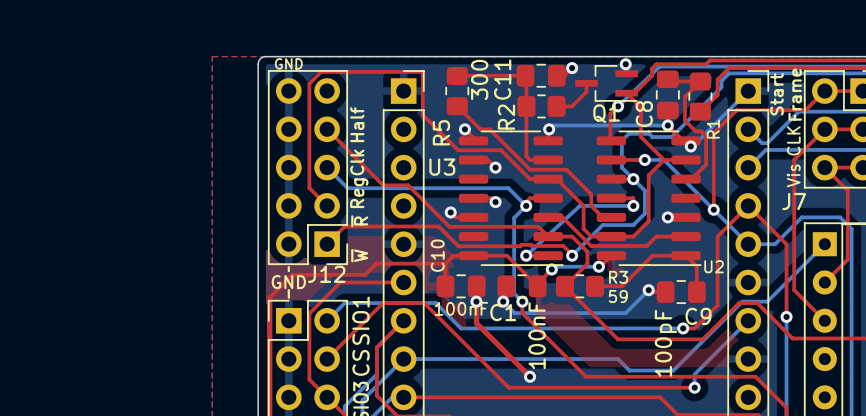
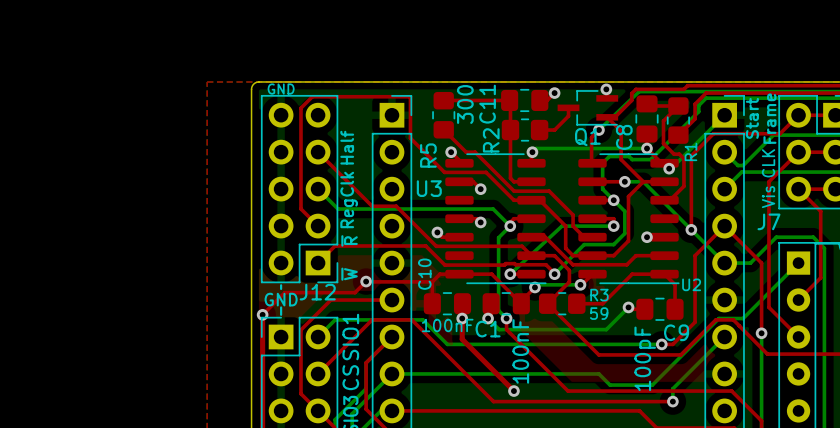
via: none -> (366, 281)
via: none -> (262, 314)

